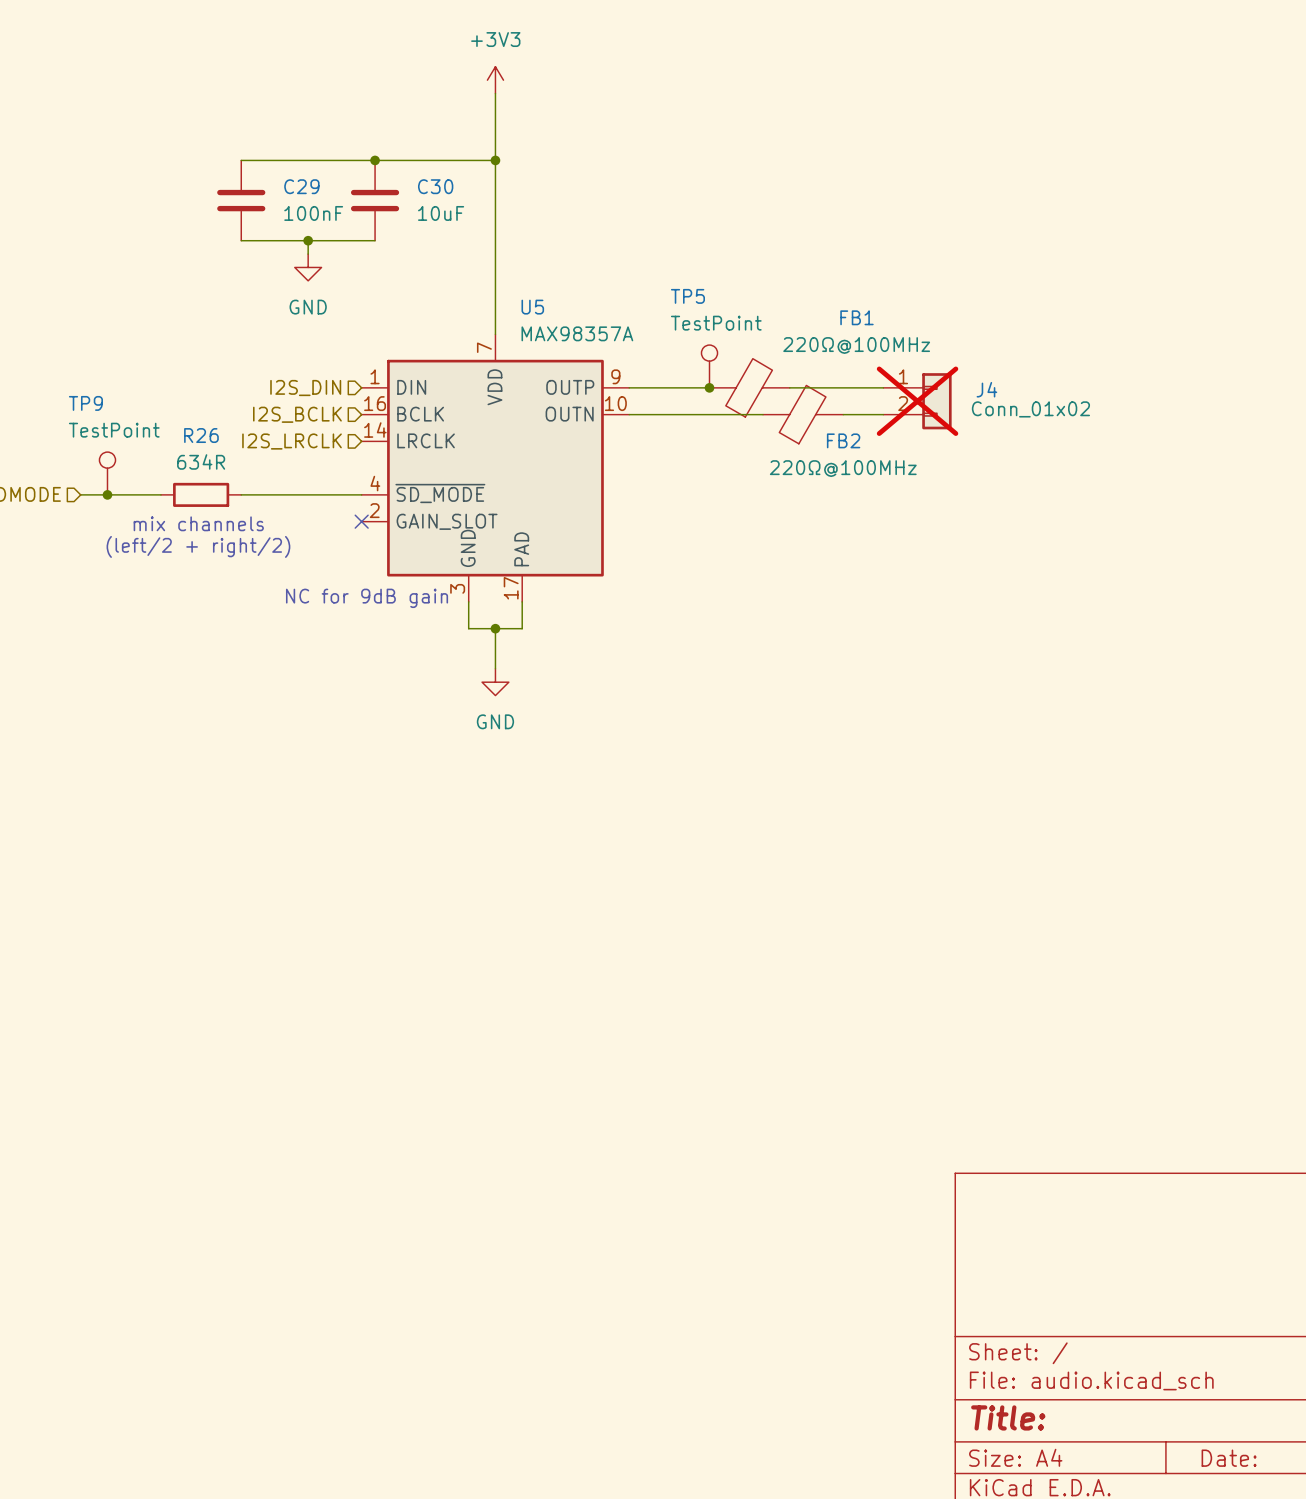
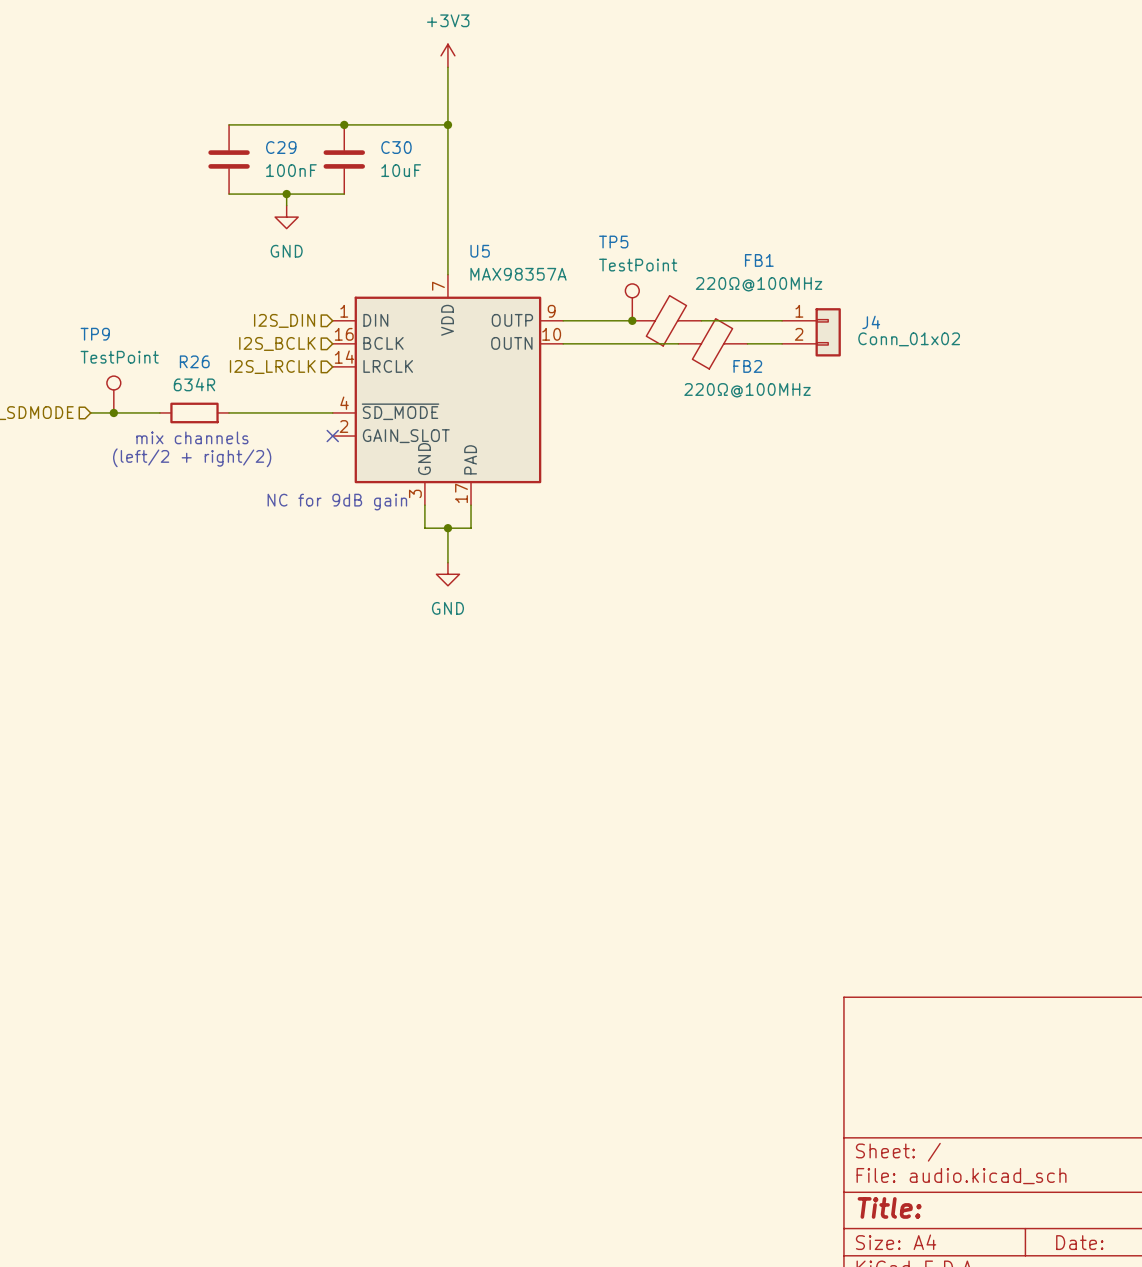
J4 do-not-place cross: (917, 401) -> none

